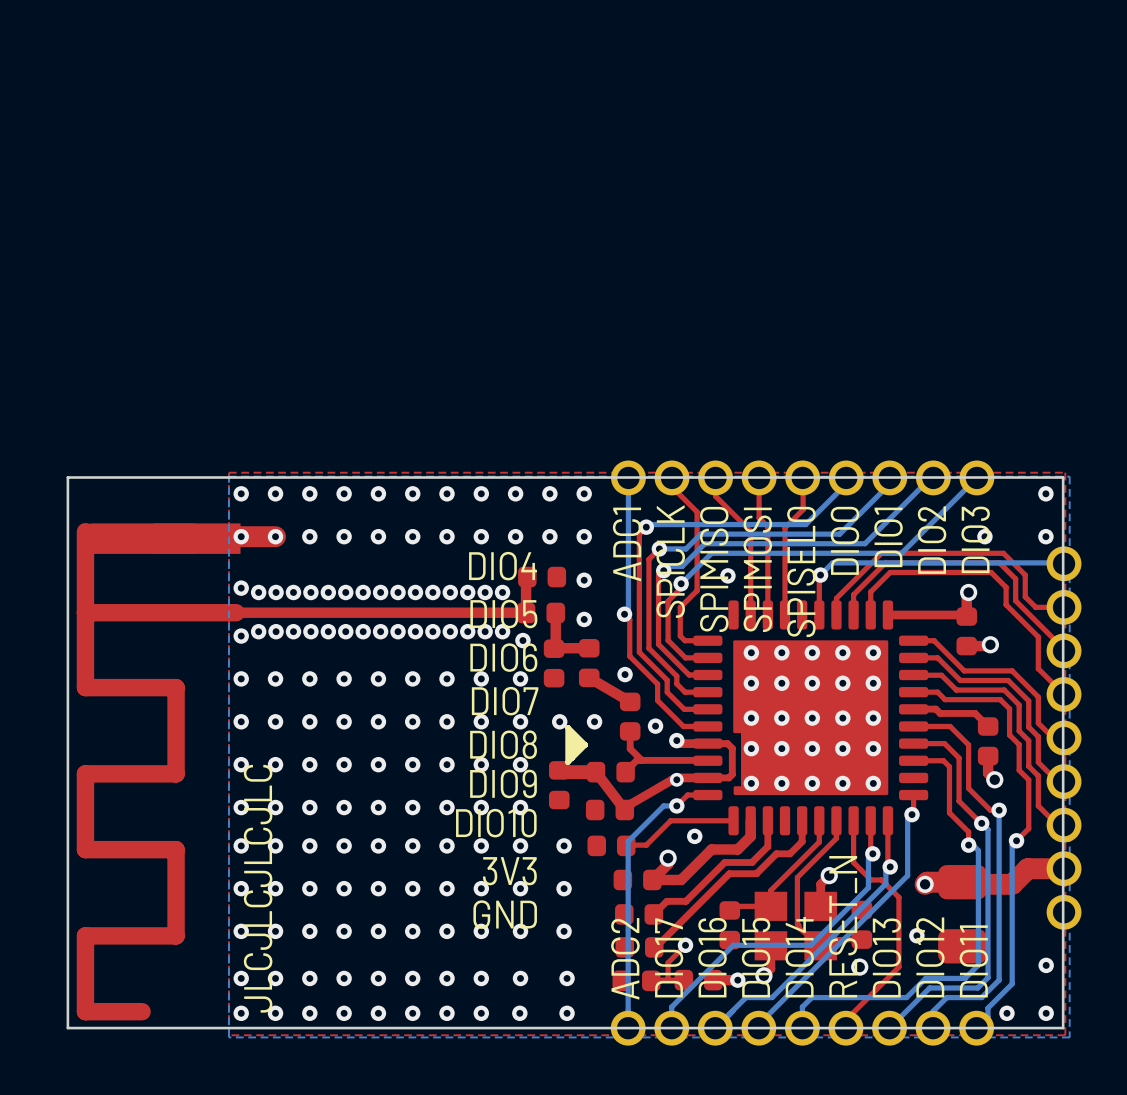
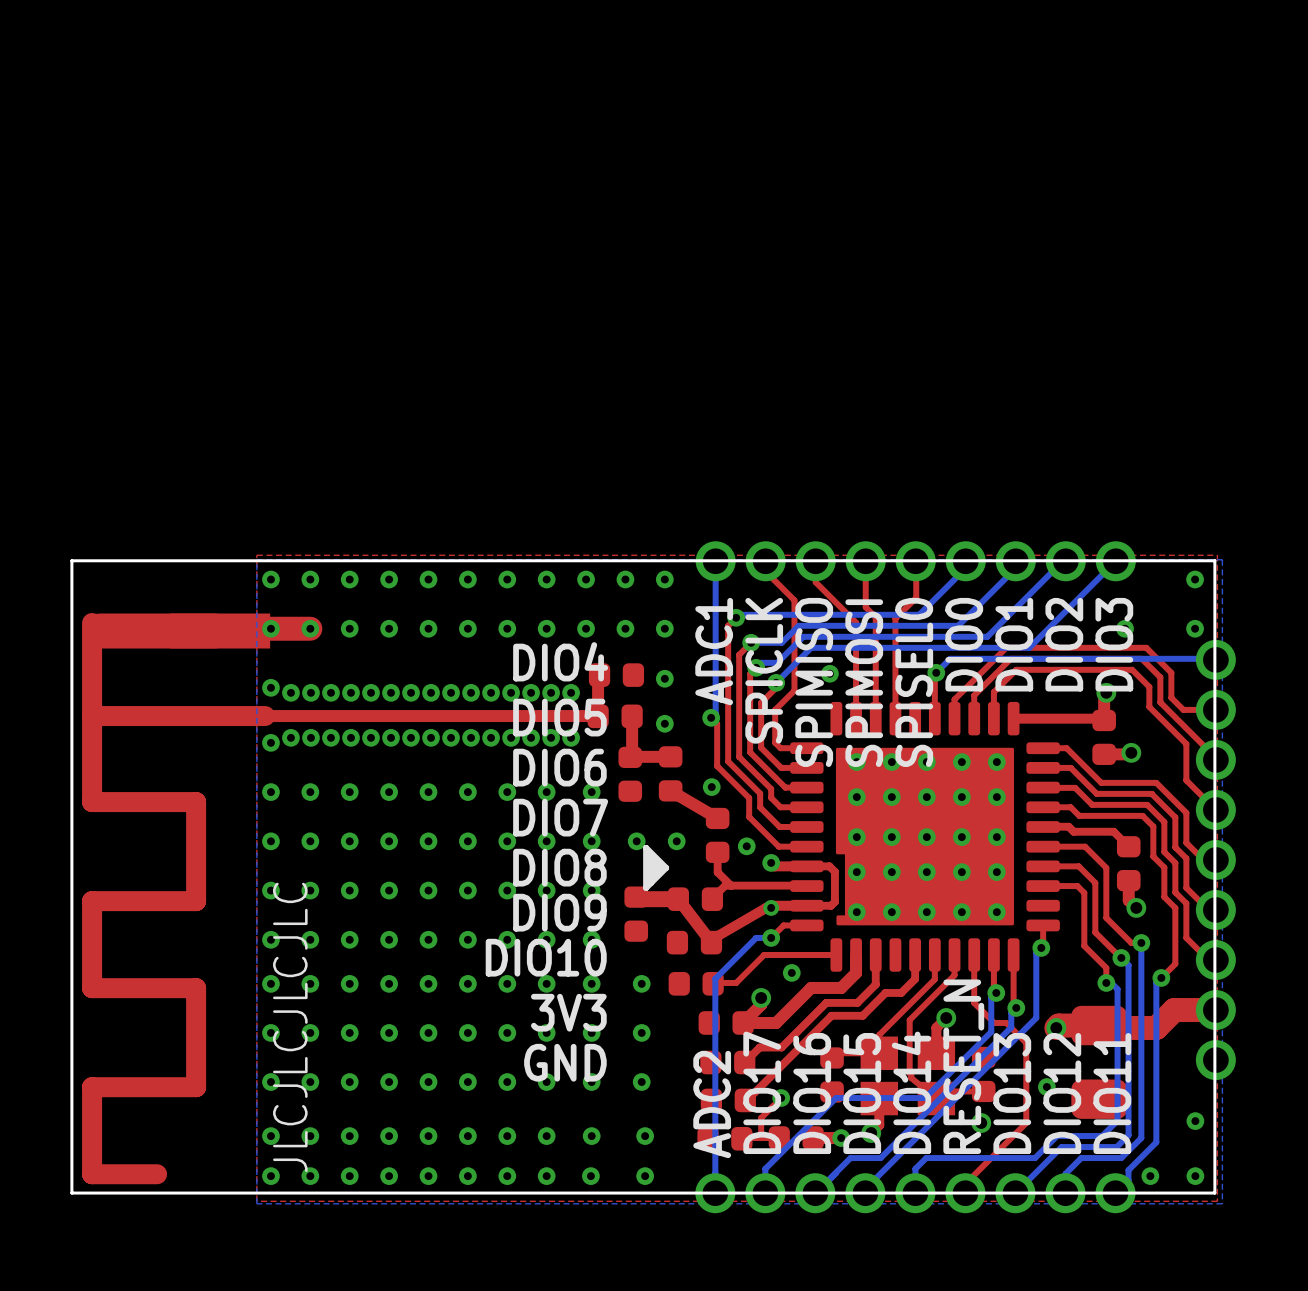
via: (522, 640) -> none

